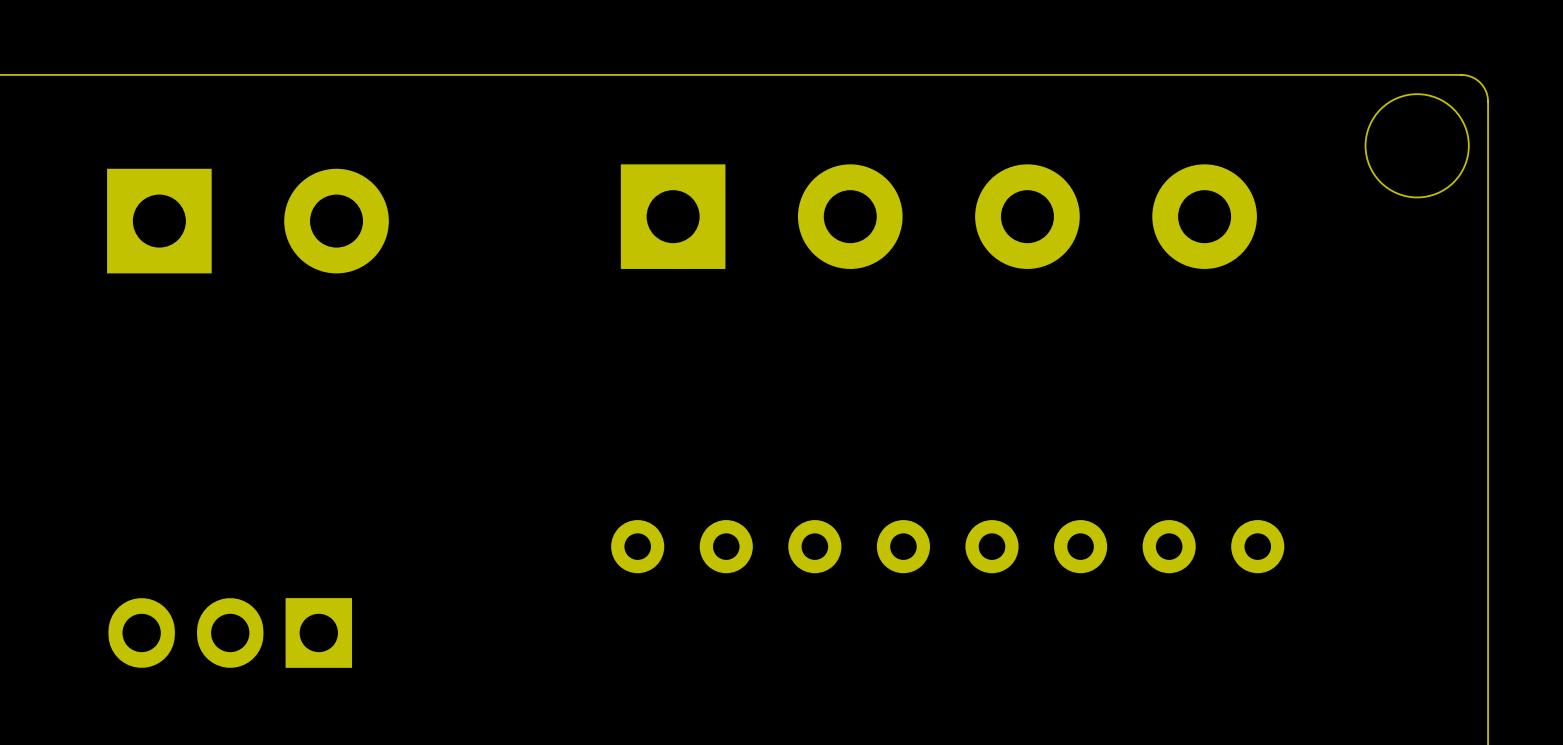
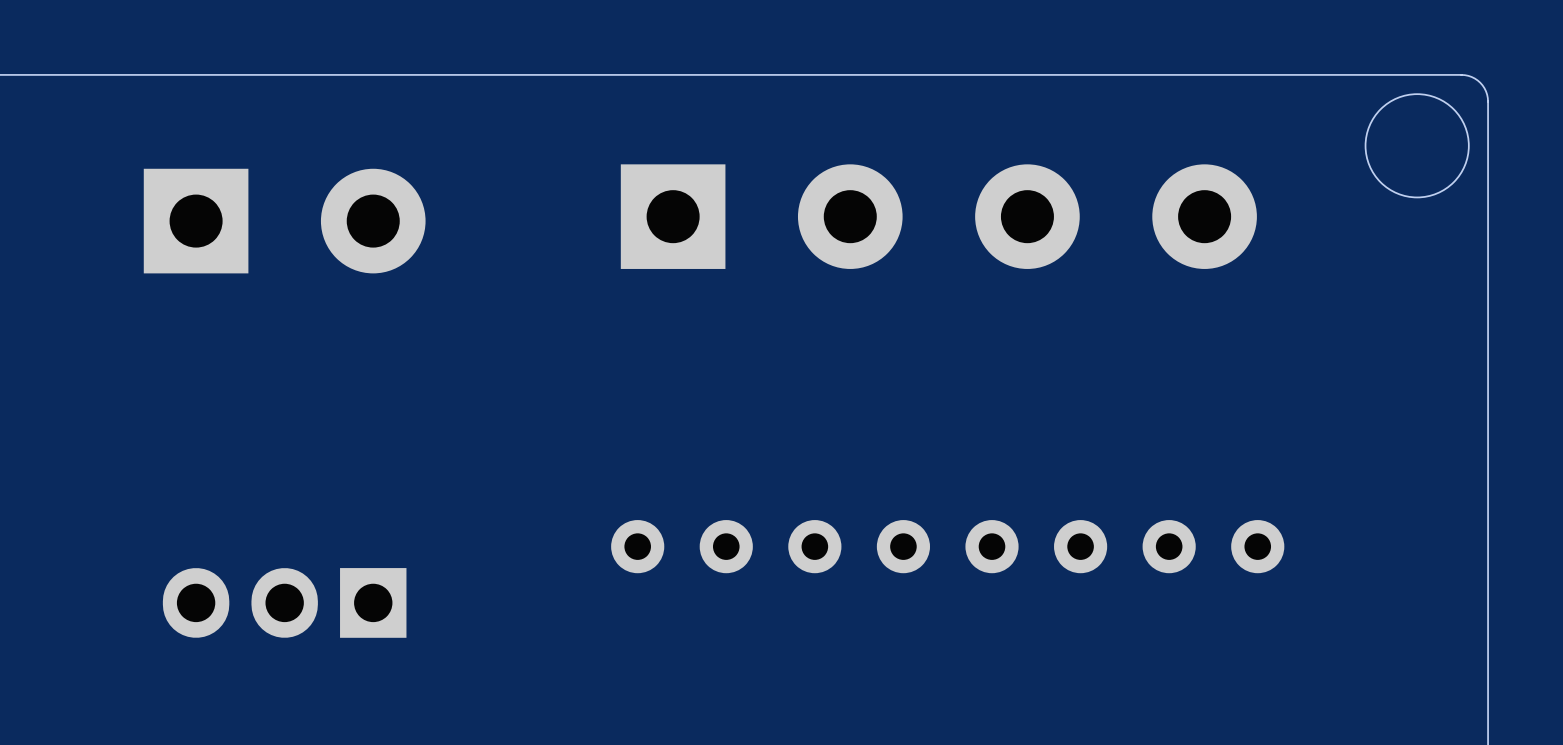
part position: (247, 221) -> (284, 221)
part position: (230, 632) -> (284, 602)

